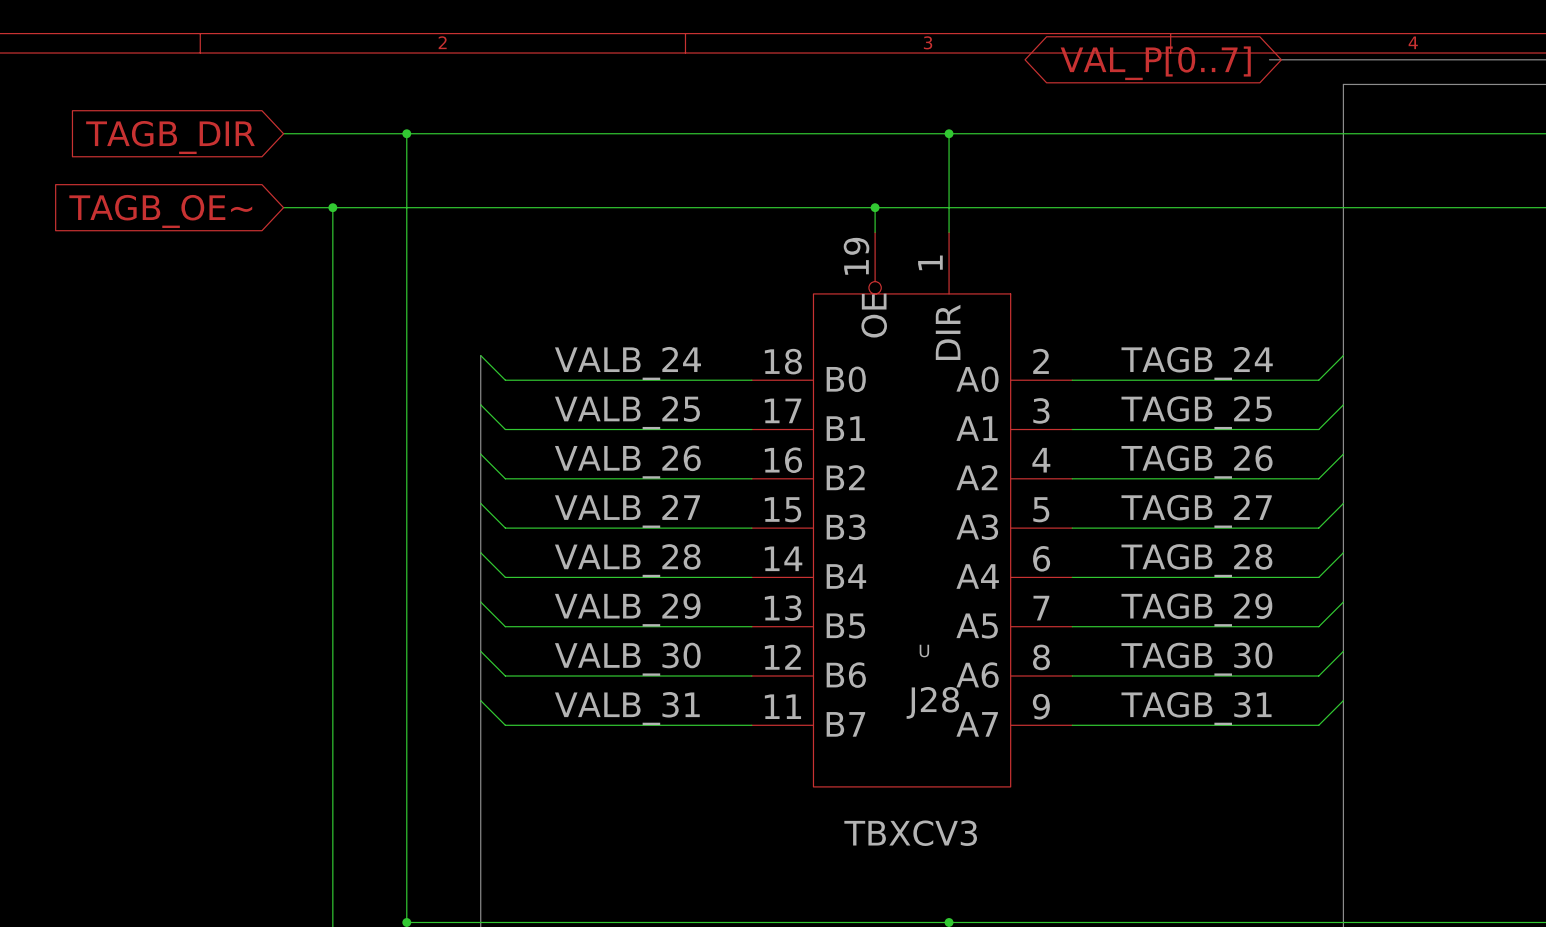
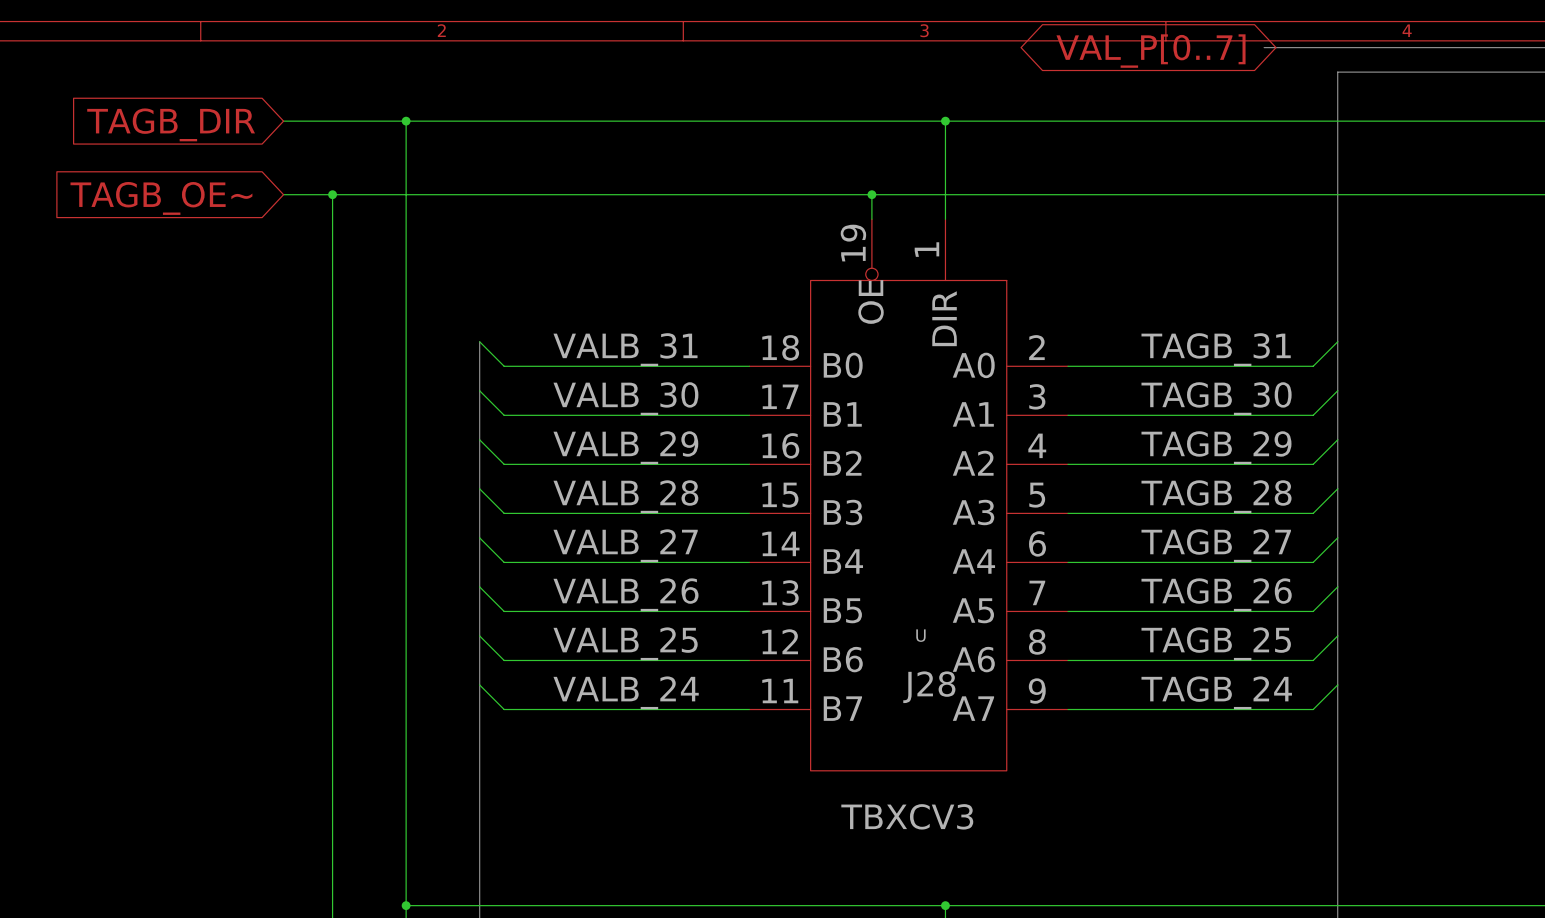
label: VALB_24 (627, 363) -> VALB_31 (625, 349)
label: TAGB_24 (1197, 363) -> TAGB_31 (1216, 349)
label: VALB_25 (627, 412) -> VALB_30 (625, 398)
label: TAGB_25 (1196, 412) -> TAGB_30 (1216, 398)
label: VALB_26 (627, 462) -> VALB_29 (625, 447)
label position: TAGB_26 (1197, 462) -> TAGB_26 (1216, 594)
label: VALB_27 (627, 511) -> VALB_28 (625, 496)
label position: TAGB_27 (1196, 511) -> TAGB_27 (1216, 545)
label: VALB_28 (627, 560) -> VALB_27 (625, 545)
label position: TAGB_28 (1196, 560) -> TAGB_28 (1216, 496)
label: VALB_29 (627, 609) -> VALB_26 (625, 594)
label position: TAGB_29 (1196, 609) -> TAGB_29 (1216, 447)
label: VALB_30 (627, 659) -> VALB_25 (625, 643)
label: TAGB_30 (1196, 659) -> TAGB_25 (1216, 643)
label: VALB_31 (627, 708) -> VALB_24 (626, 692)
label: TAGB_31 (1196, 708) -> TAGB_24 (1216, 692)

